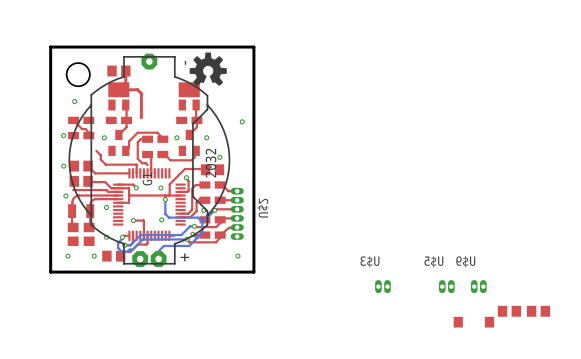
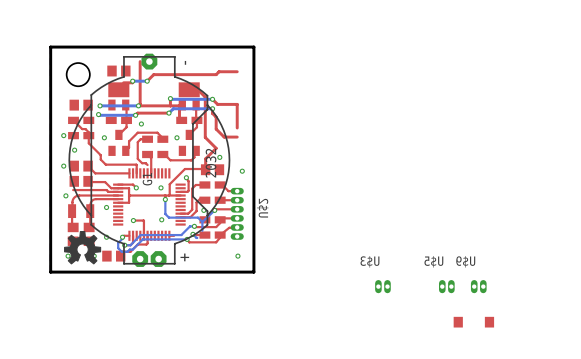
drawing: [189, 52, 227, 86] -> none
top track: none -> (140, 61) (140, 104) (138, 105) (180, 105)
top track: (125, 71) (125, 82) (118, 89) (137, 89) (141, 93) (141, 117) -> none
top track: none -> (237, 71) (219, 71) (216, 74) (153, 74) (147, 81)
top track: none -> (132, 81) (132, 82) (123, 82)
via: none -> (132, 81)
bottom track: none -> (147, 81) (132, 81)
via: none -> (147, 81)
top track: none -> (187, 89) (197, 89) (205, 97) (205, 137) (216, 148) (205, 158) (205, 169)
top track: none -> (170, 98) (170, 105)
bottom track: none -> (170, 98) (212, 99)
via: none -> (170, 98)
top track: none -> (212, 99) (217, 104) (237, 104) (237, 128)
via: none -> (212, 99)
via: (74, 101) -> none
part: none -> (81, 105)
via: none -> (100, 105)
bottom track: none -> (138, 105) (100, 105)
via: none -> (138, 105)
top track: none -> (179, 105) (179, 120)
top track: none -> (212, 108) (212, 113) (216, 117) (216, 129) (224, 137) (237, 137)
bottom track: none -> (212, 108) (173, 108) (168, 113)
via: none -> (212, 108)
top track: none -> (168, 113) (137, 113) (135, 115)
via: none -> (168, 113)
bottom track: none -> (98, 114) (135, 115)
via: none -> (98, 114)
via: none -> (135, 115)
via: (242, 121) -> none
via: none -> (141, 124)
top track: none -> (88, 135) (88, 143) (96, 150)
via: (206, 137) -> none
via: none -> (74, 150)
via: none -> (242, 171)
bottom track: (202, 230) (189, 245) (163, 245) (158, 251) (158, 260) -> none
drawing: none -> [64, 231, 102, 265]
part: (509, 311) -> none
part: (538, 311) -> none

